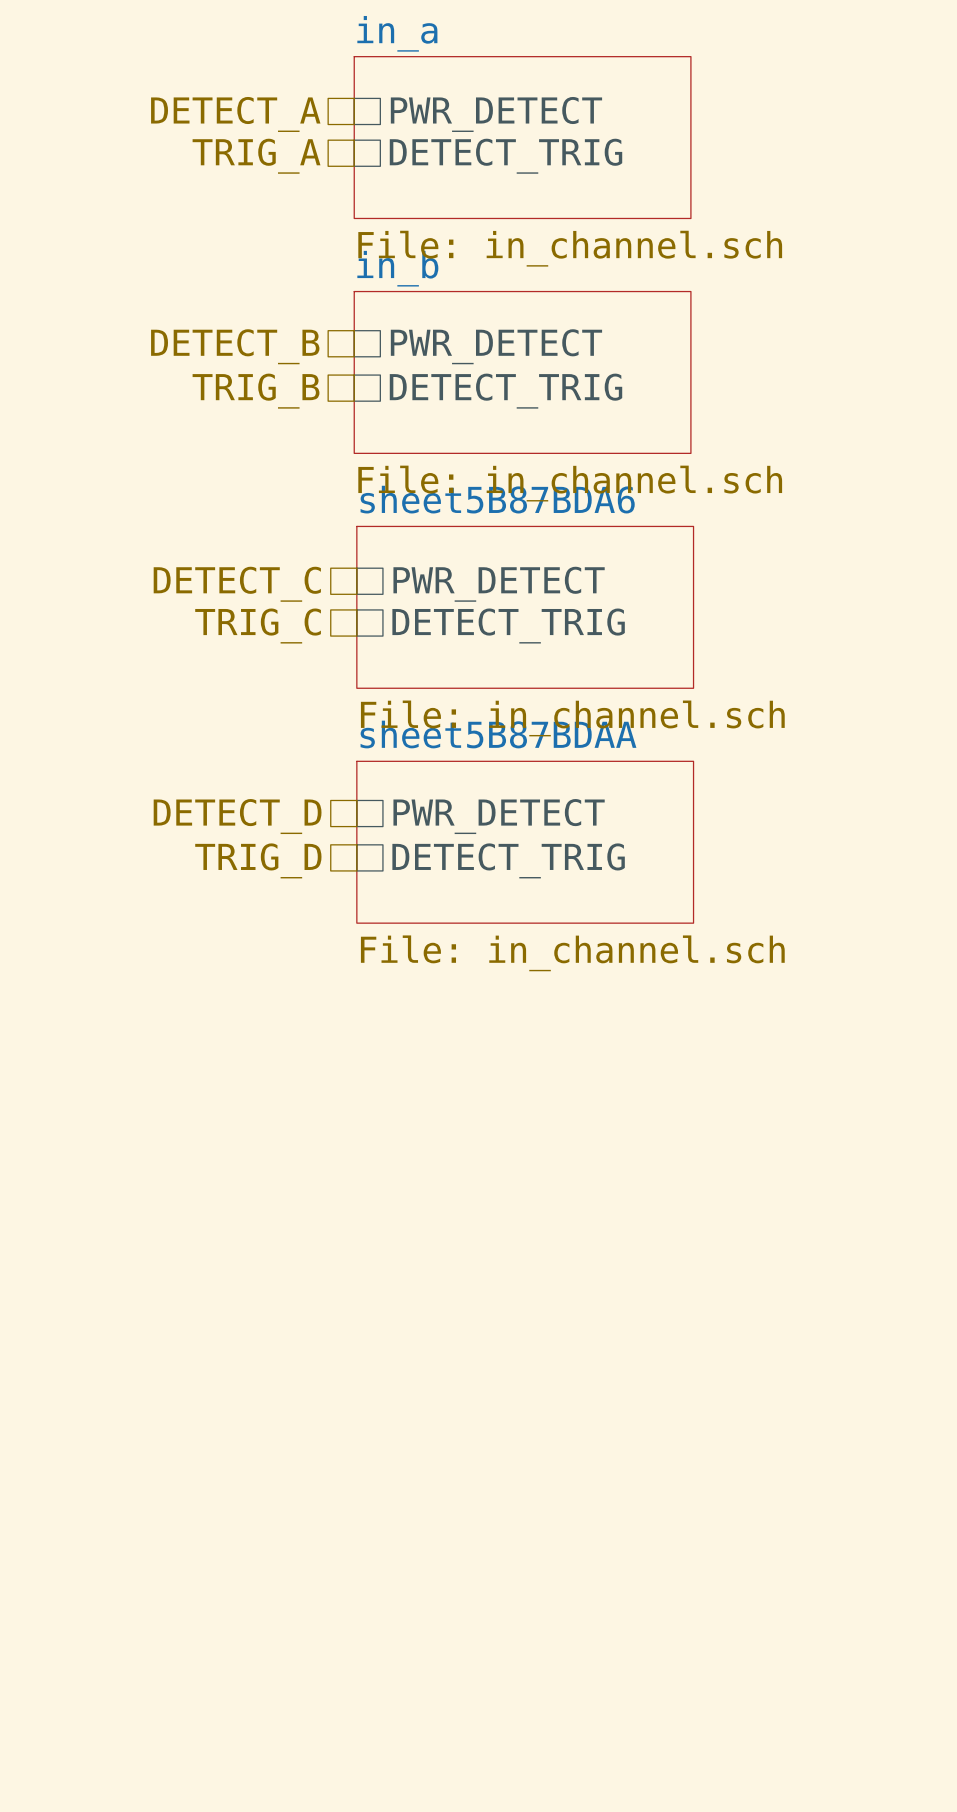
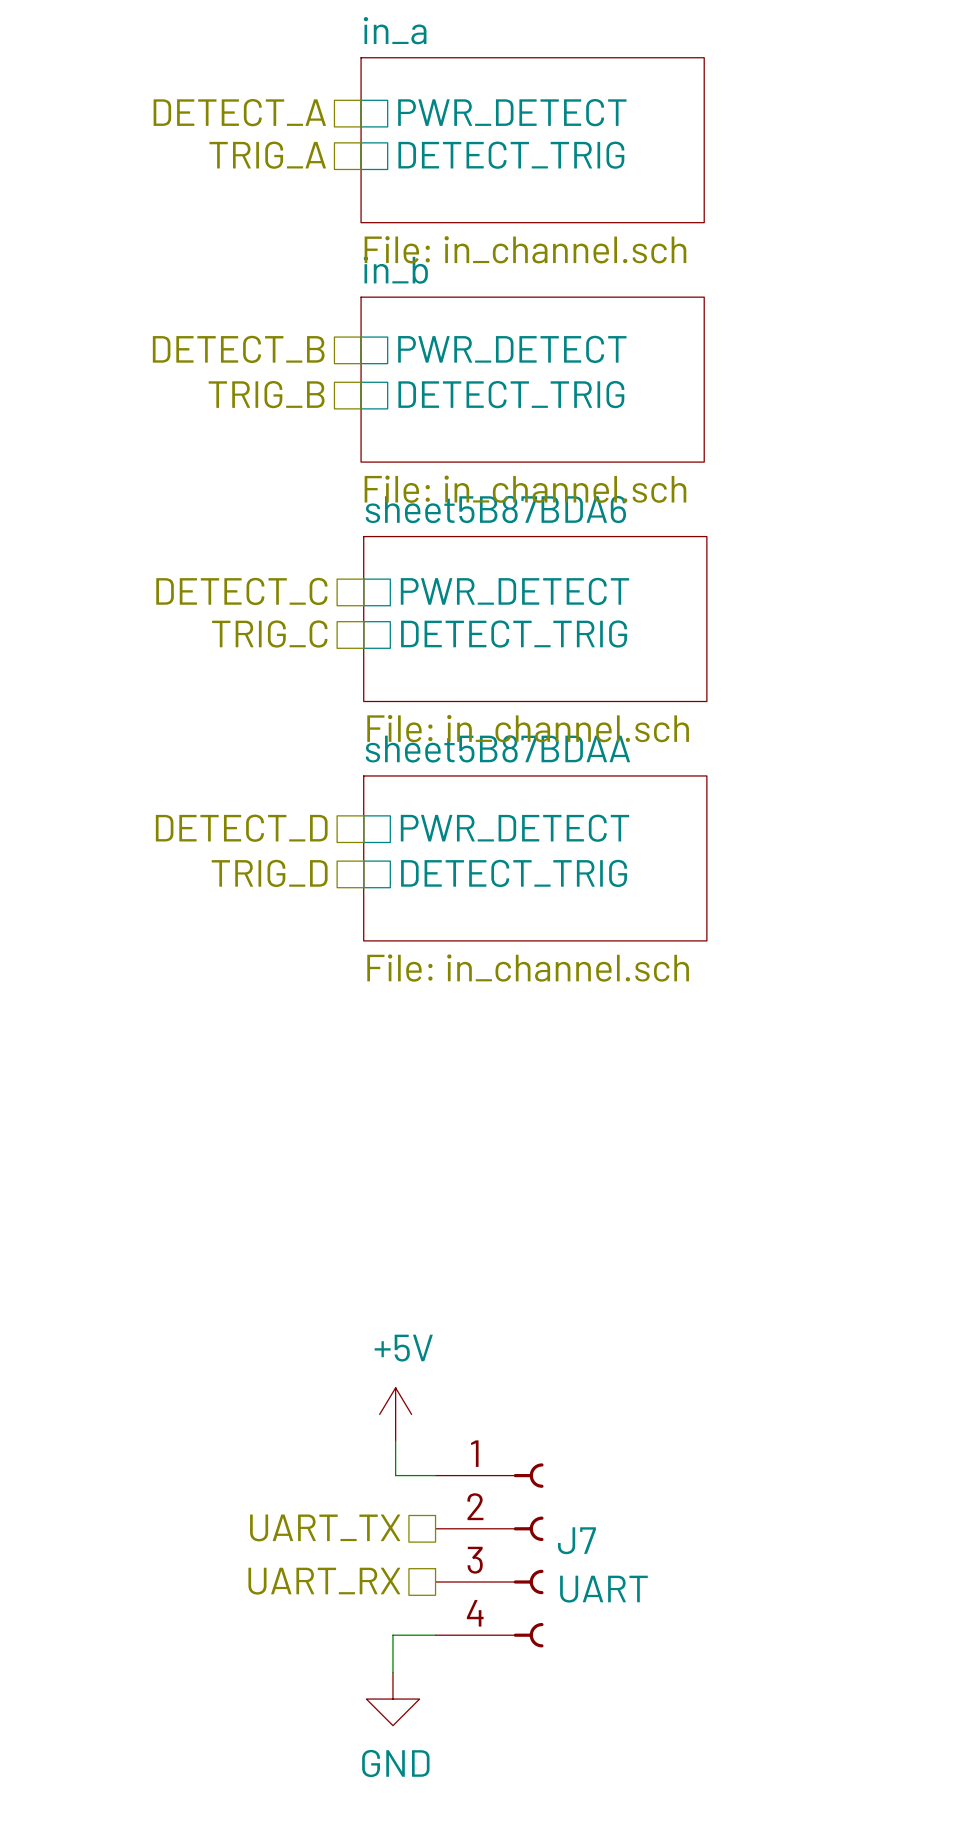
power symbol: none -> +5V (395, 1414)
wire: none -> (395, 1441) (395, 1475) (435, 1475)
hierarchical label: none -> UART_TX (325, 1527)
J7: none -> UART (489, 1555)
hierarchical label: none -> UART_RX (324, 1581)
wire: none -> (435, 1635) (392, 1635) (392, 1672)
power symbol: none -> GND (392, 1699)

